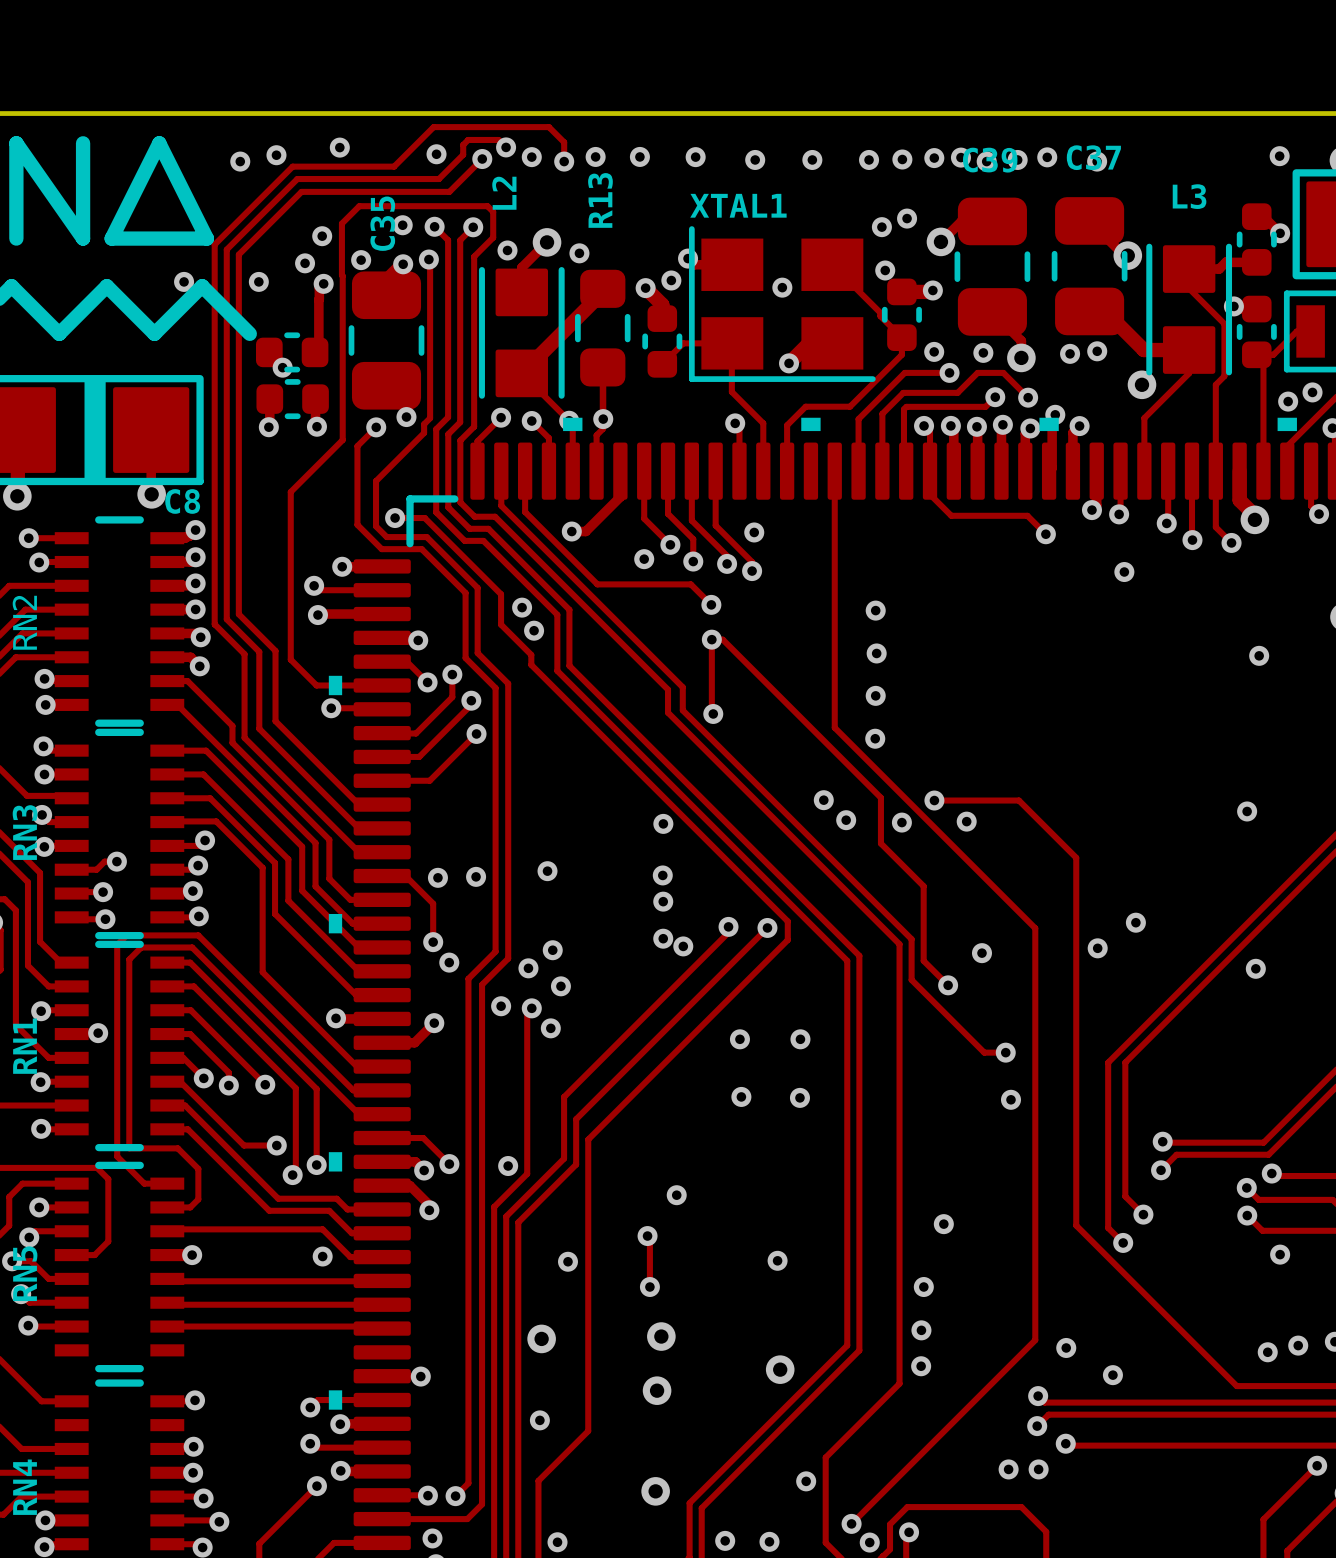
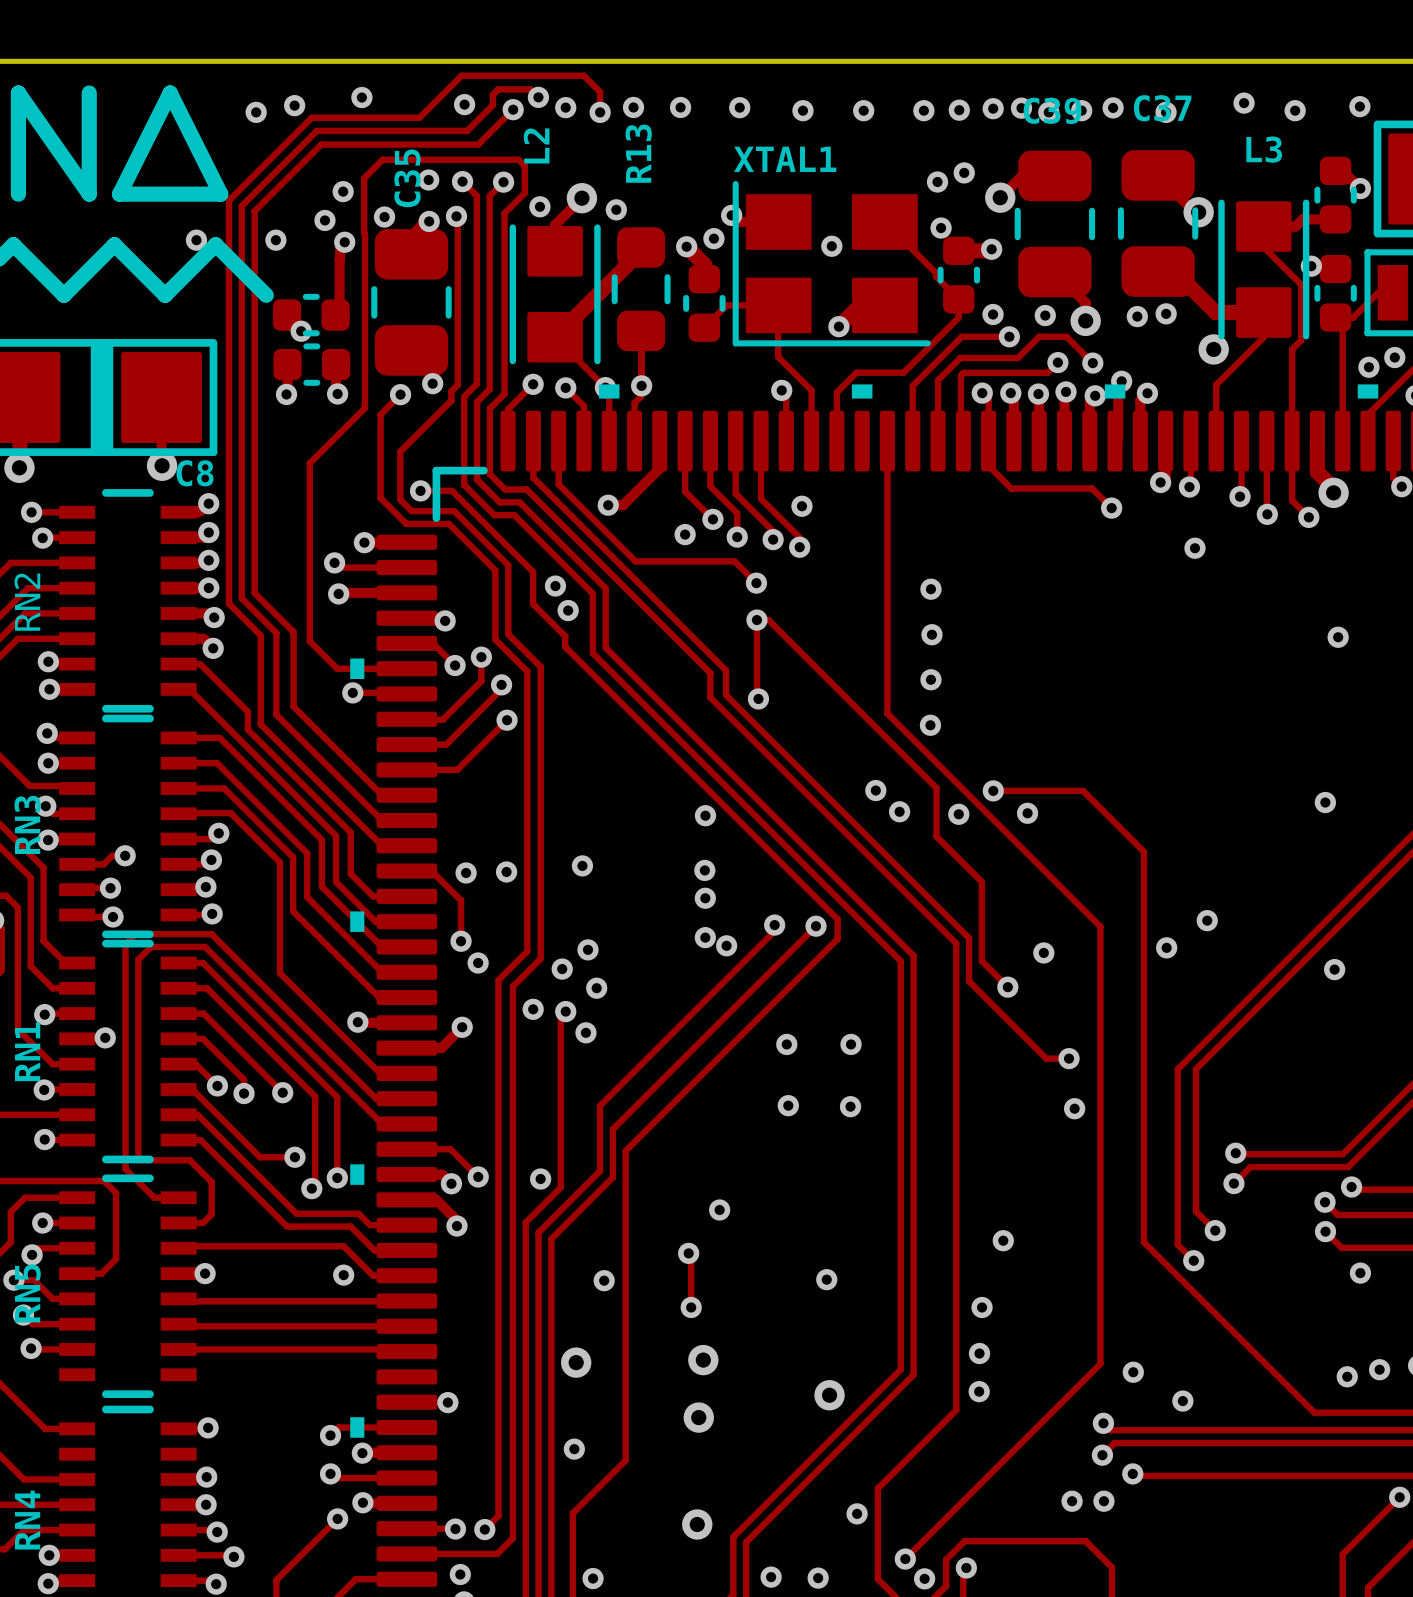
via: none -> (1244, 103)
via: none -> (1295, 110)

